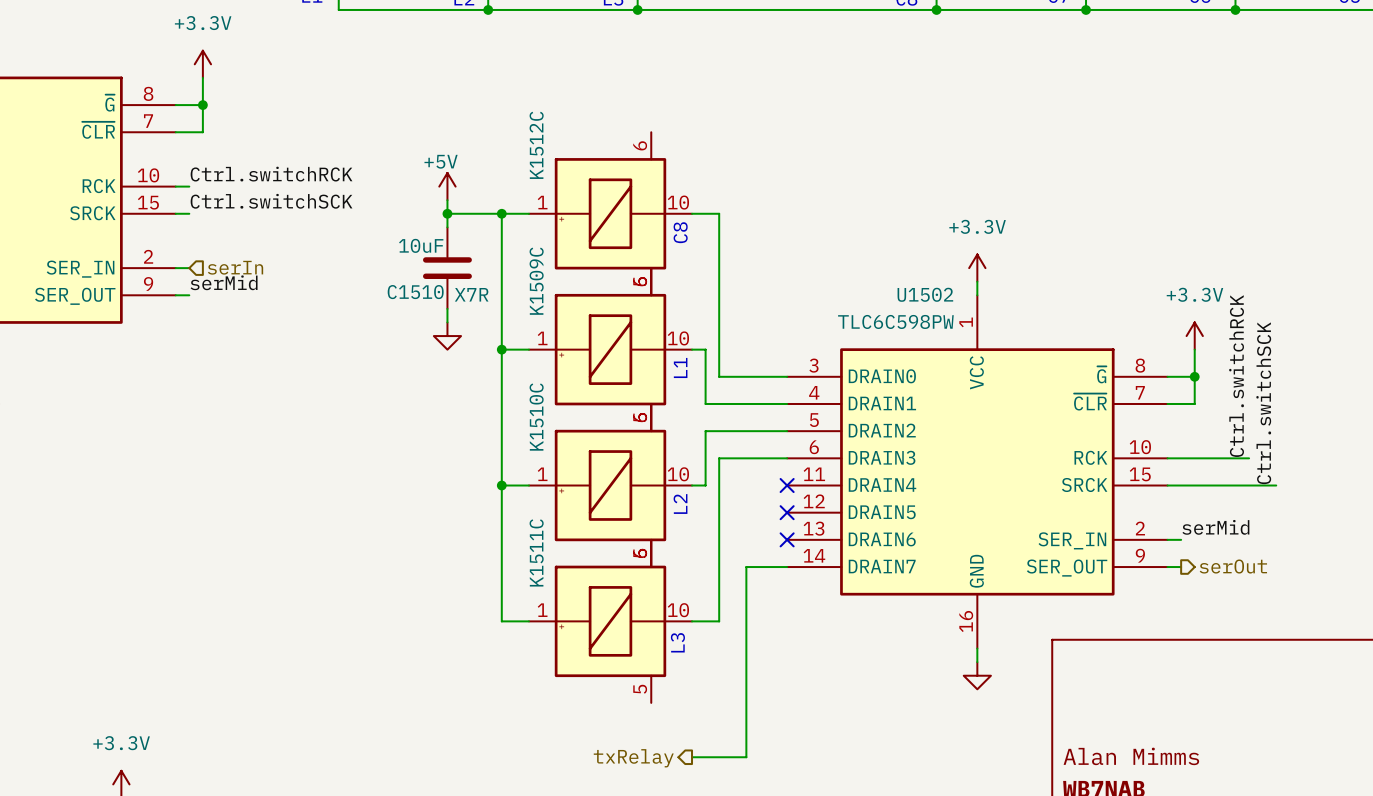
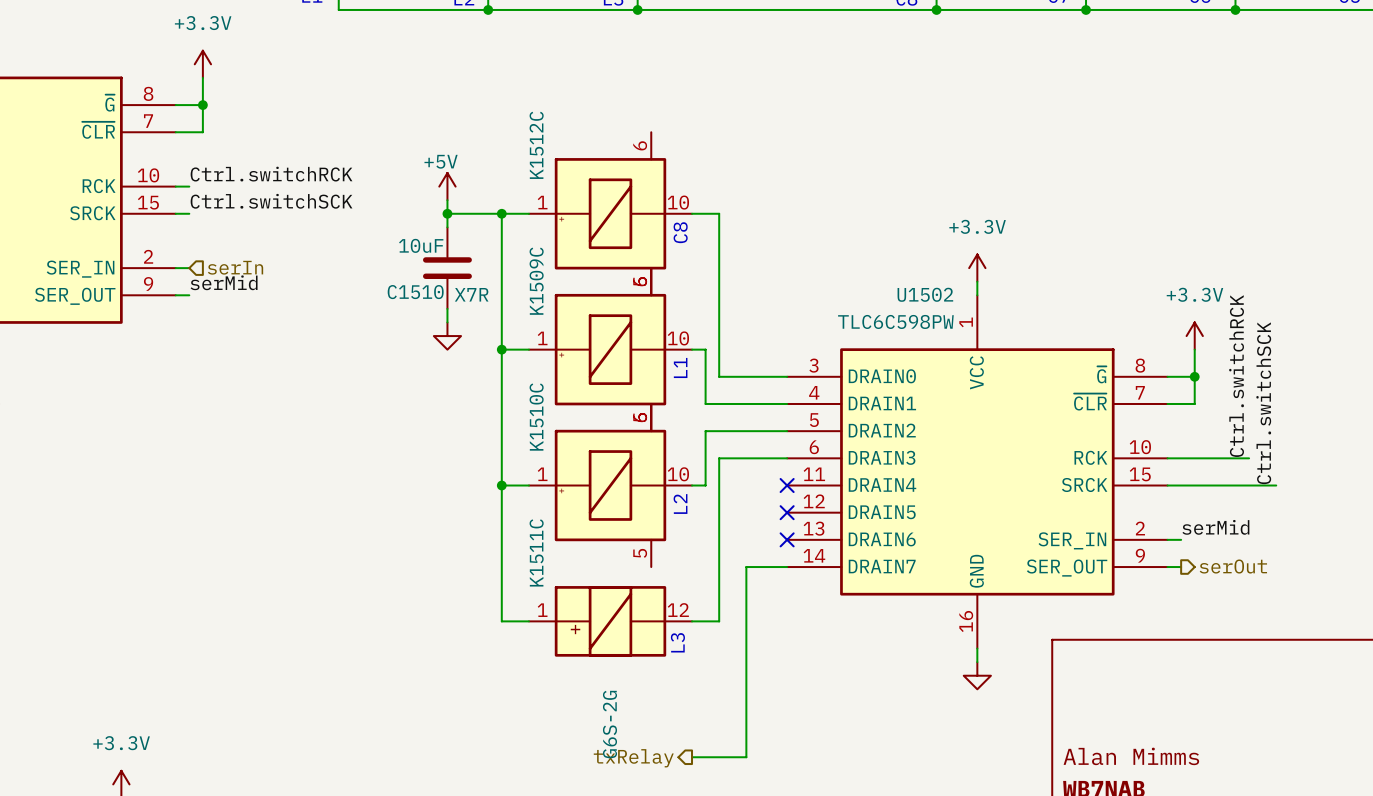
K1511C symbol: [528, 539, 693, 703] -> [528, 586, 693, 657]
K1511C value: none -> G6S-2G (609, 724)

